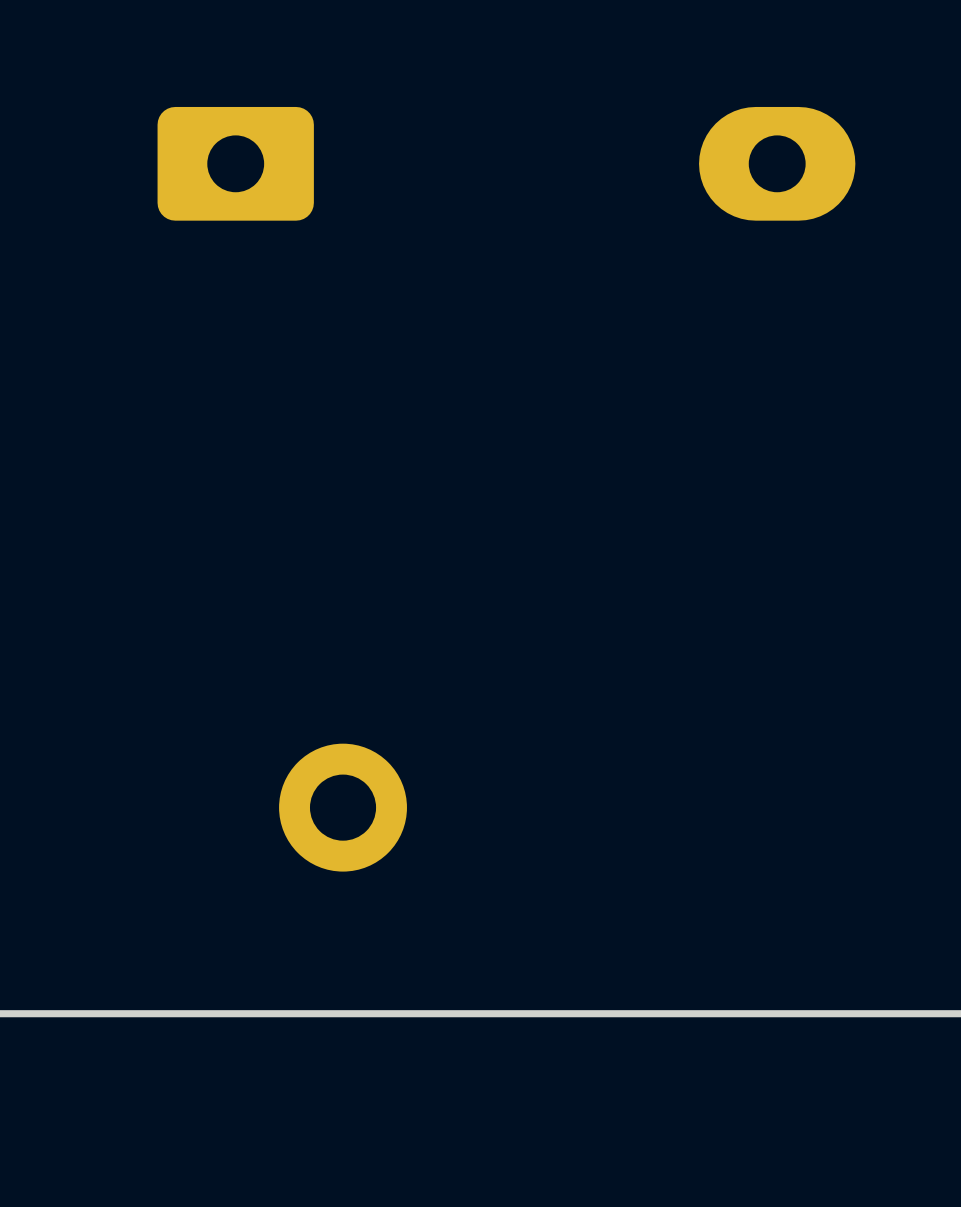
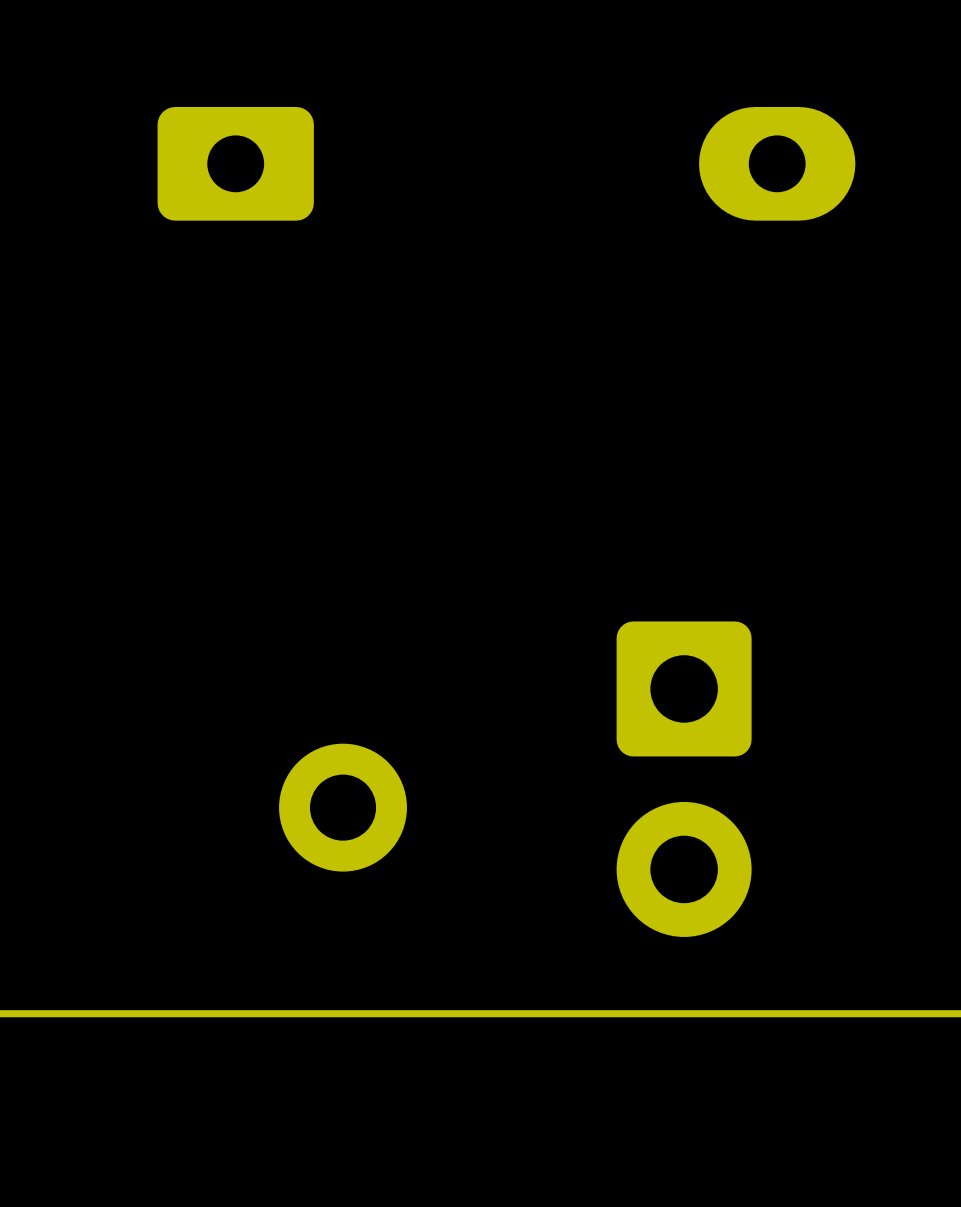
part: none -> (684, 779)

